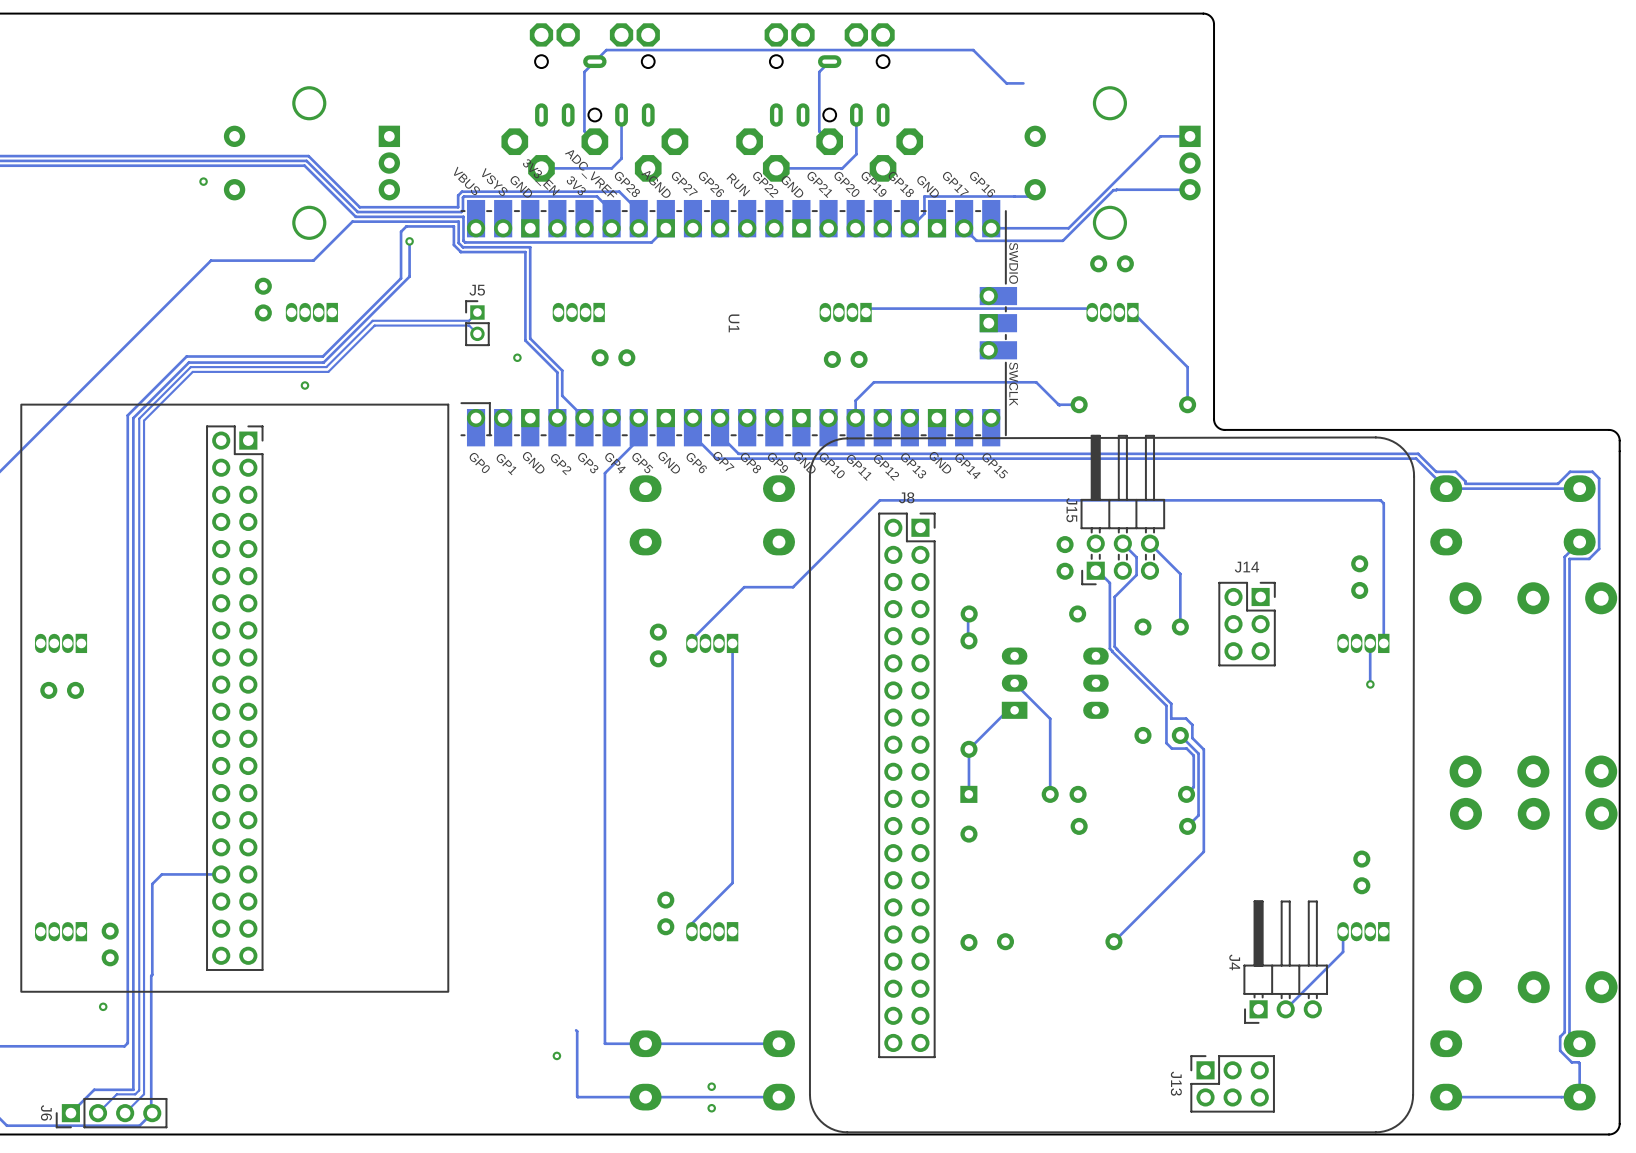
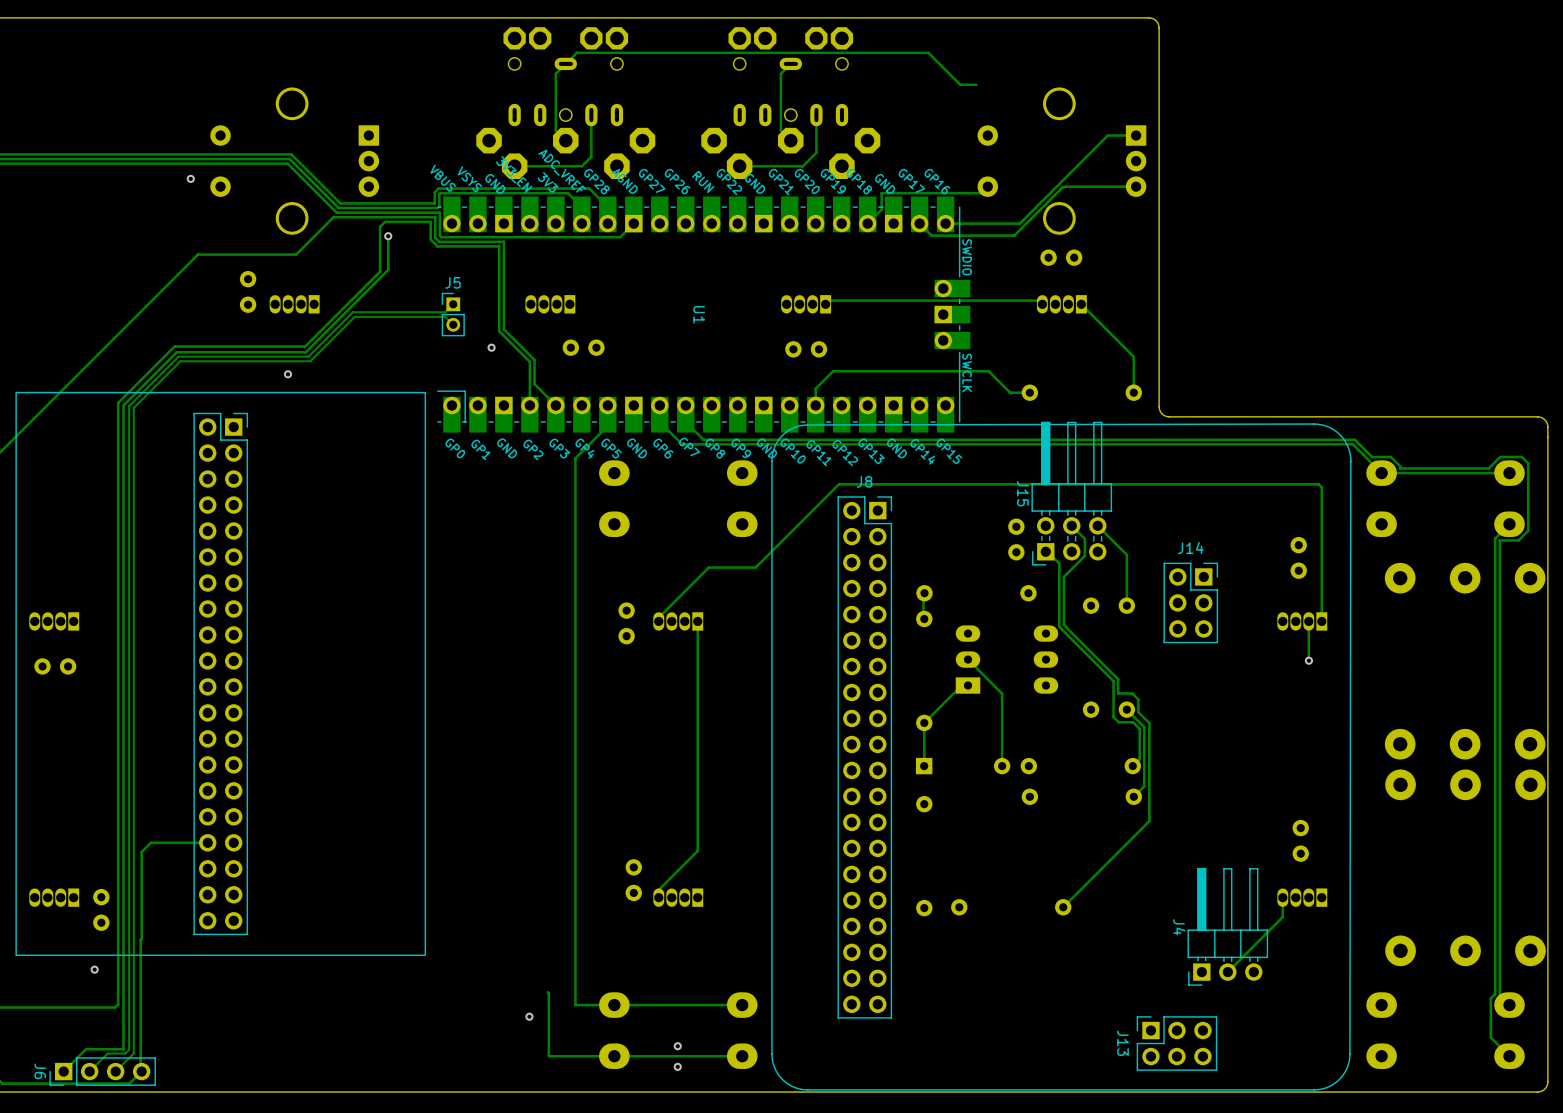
track: (1560, 1050) (1571, 1062) (1579, 1063) (1579, 1097) (1446, 1097) -> (1490, 1011) (1490, 1037) (1509, 1056)

